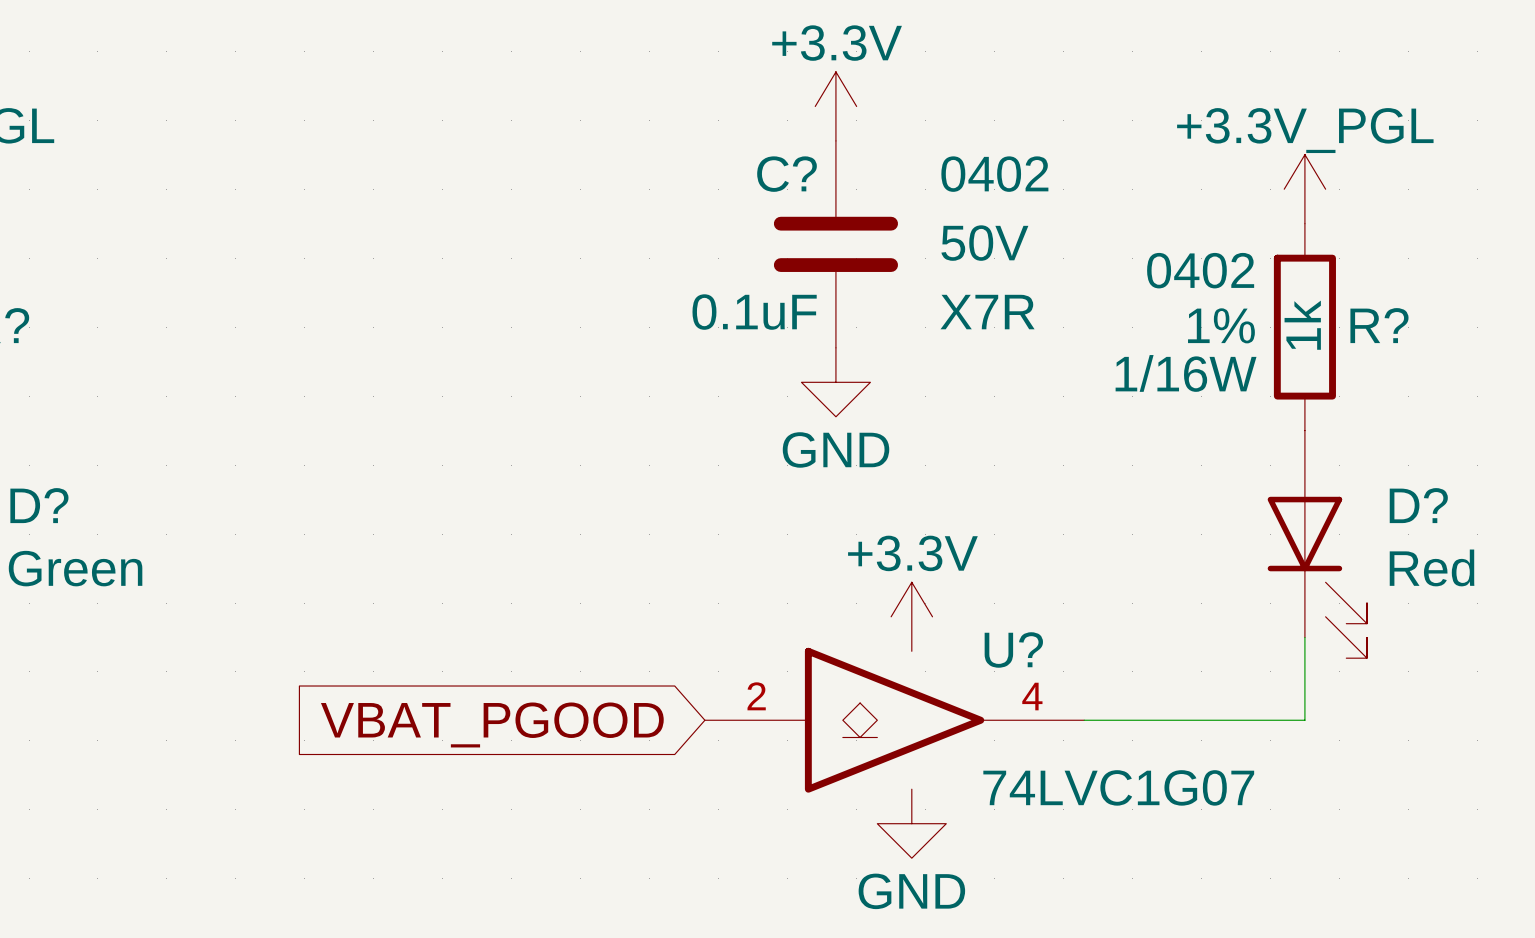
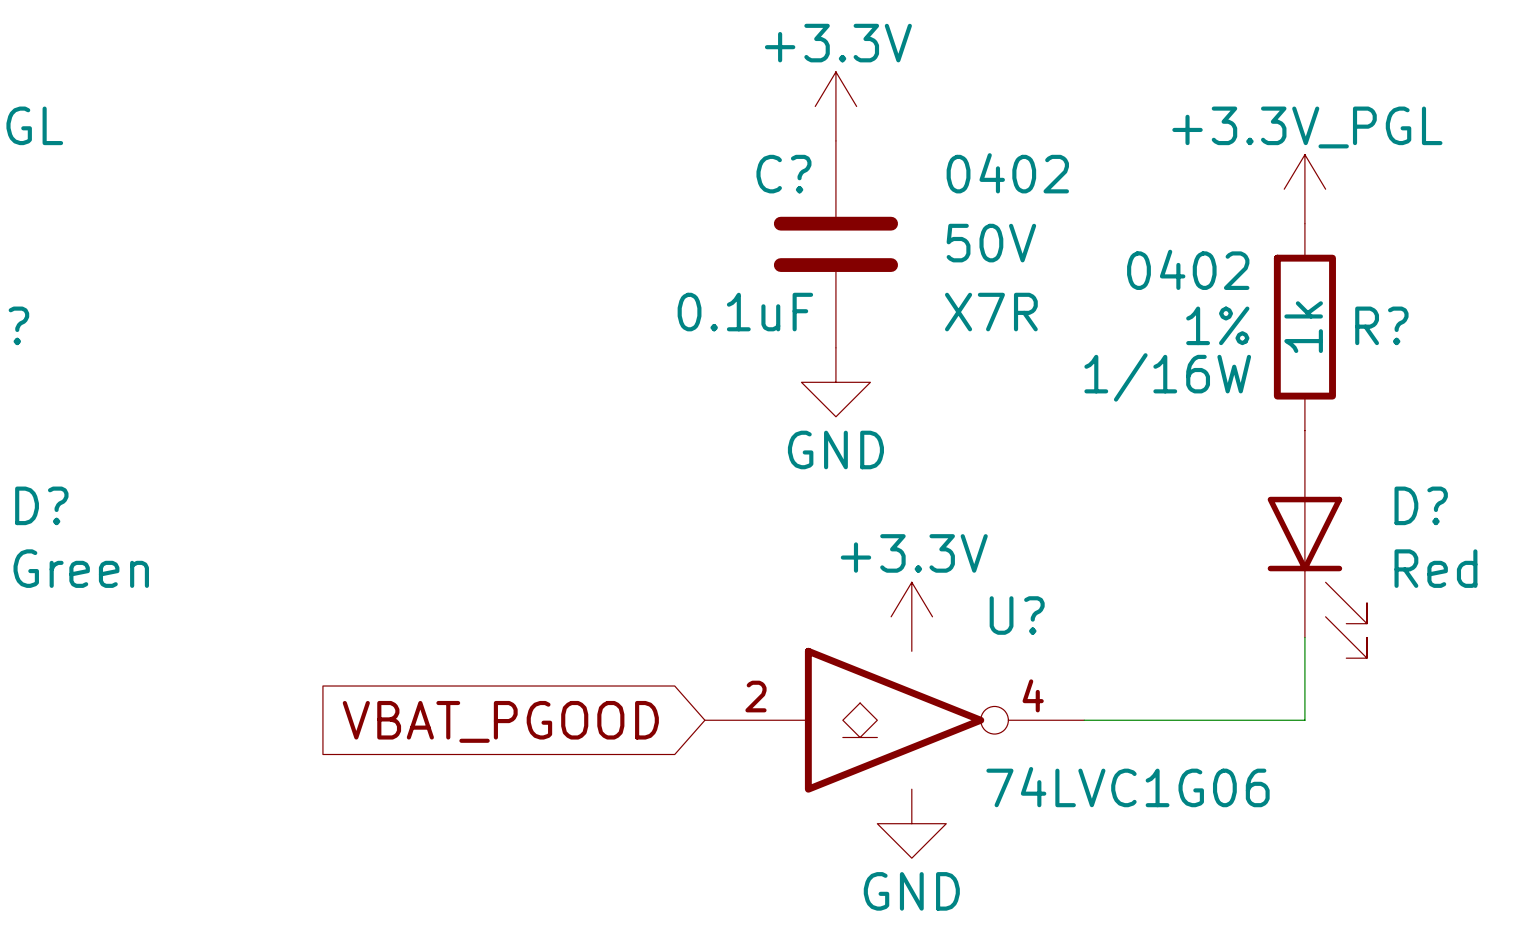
U? symbol: [704, 647, 1085, 793] -> [704, 647, 1085, 793]
U? name position: U? (1013, 649) -> U? (1017, 615)
U? value: 74LVC1G07 (1118, 787) -> 74LVC1G06 (1128, 787)

